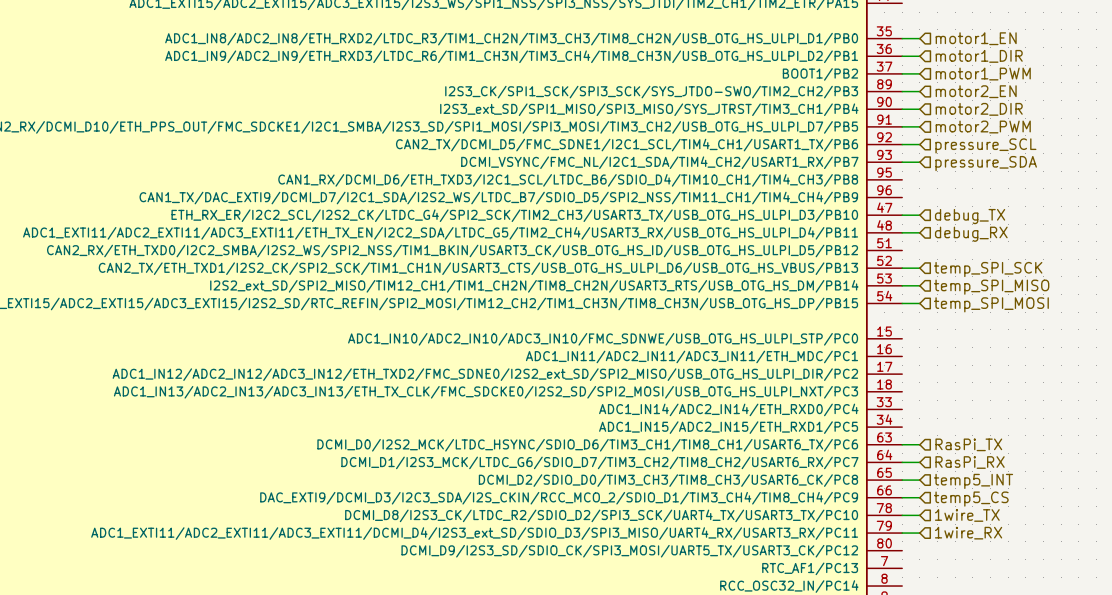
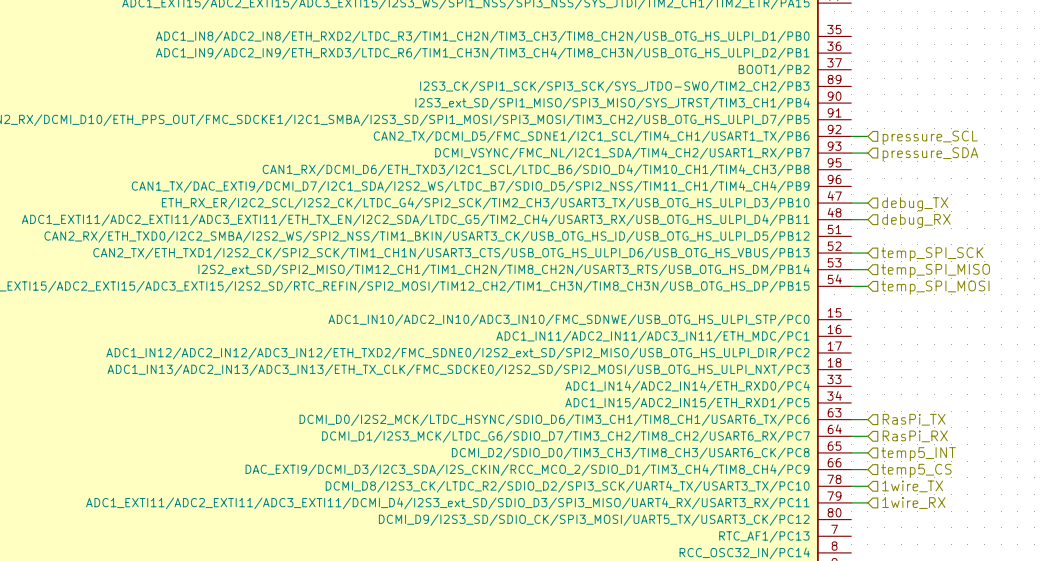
wire: (902, 38) (919, 38) -> none
hierarchical label: motor1_EN (976, 38) -> none
wire: (902, 56) (919, 56) -> none
hierarchical label: motor1_DIR (979, 56) -> none
wire: (902, 73) (919, 73) -> none
hierarchical label: motor1_PWM (983, 74) -> none
wire: (902, 91) (919, 91) -> none
hierarchical label: motor2_EN (976, 91) -> none
wire: (902, 109) (919, 109) -> none
hierarchical label: motor2_DIR (979, 109) -> none
wire: (902, 126) (919, 126) -> none
hierarchical label: motor2_PWM (983, 127) -> none

